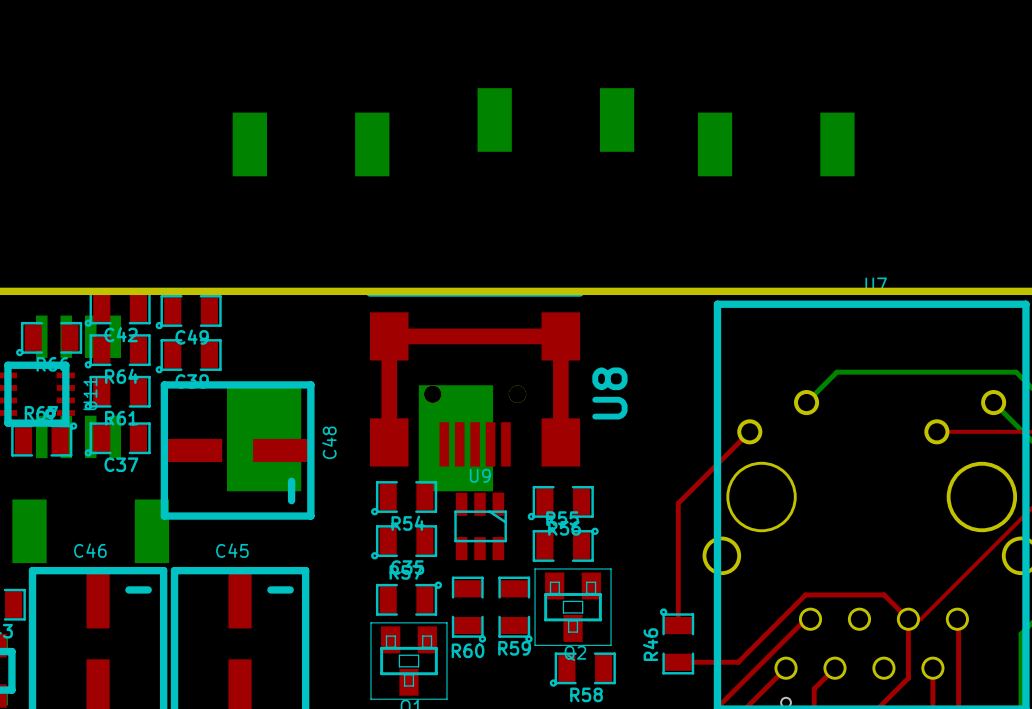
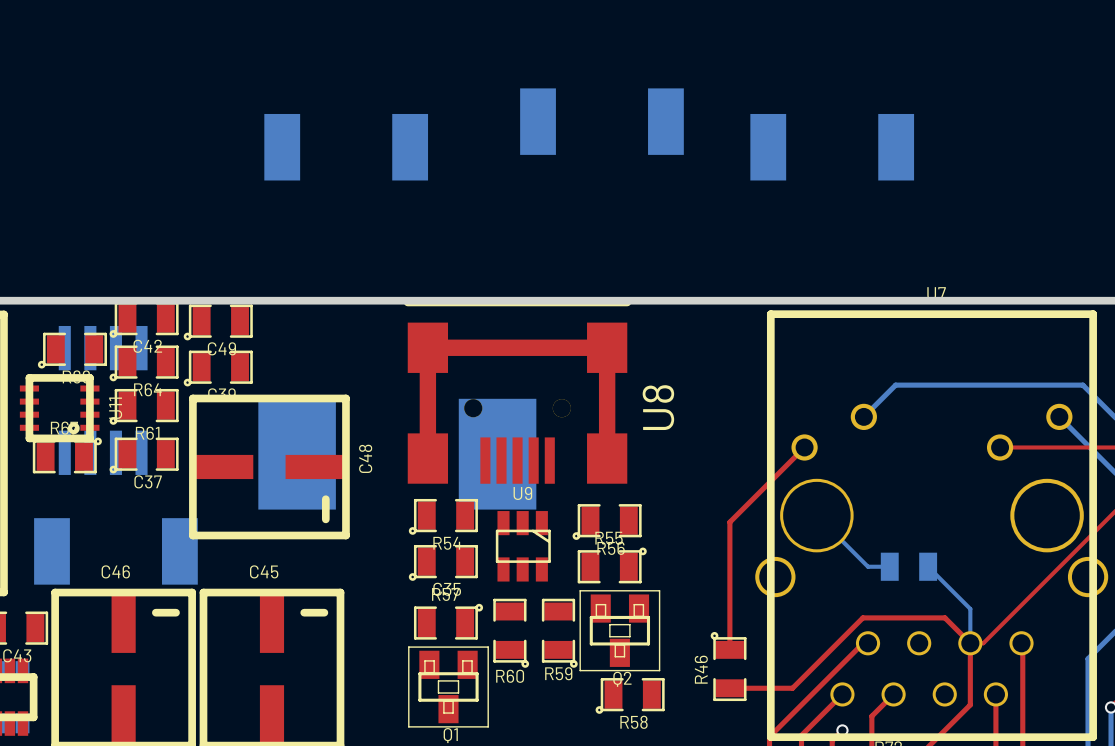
bottom track: none -> (816, 515) (868, 566) (889, 566)
part: none -> (908, 566)
bottom track: none -> (928, 566) (970, 608) (970, 643)

